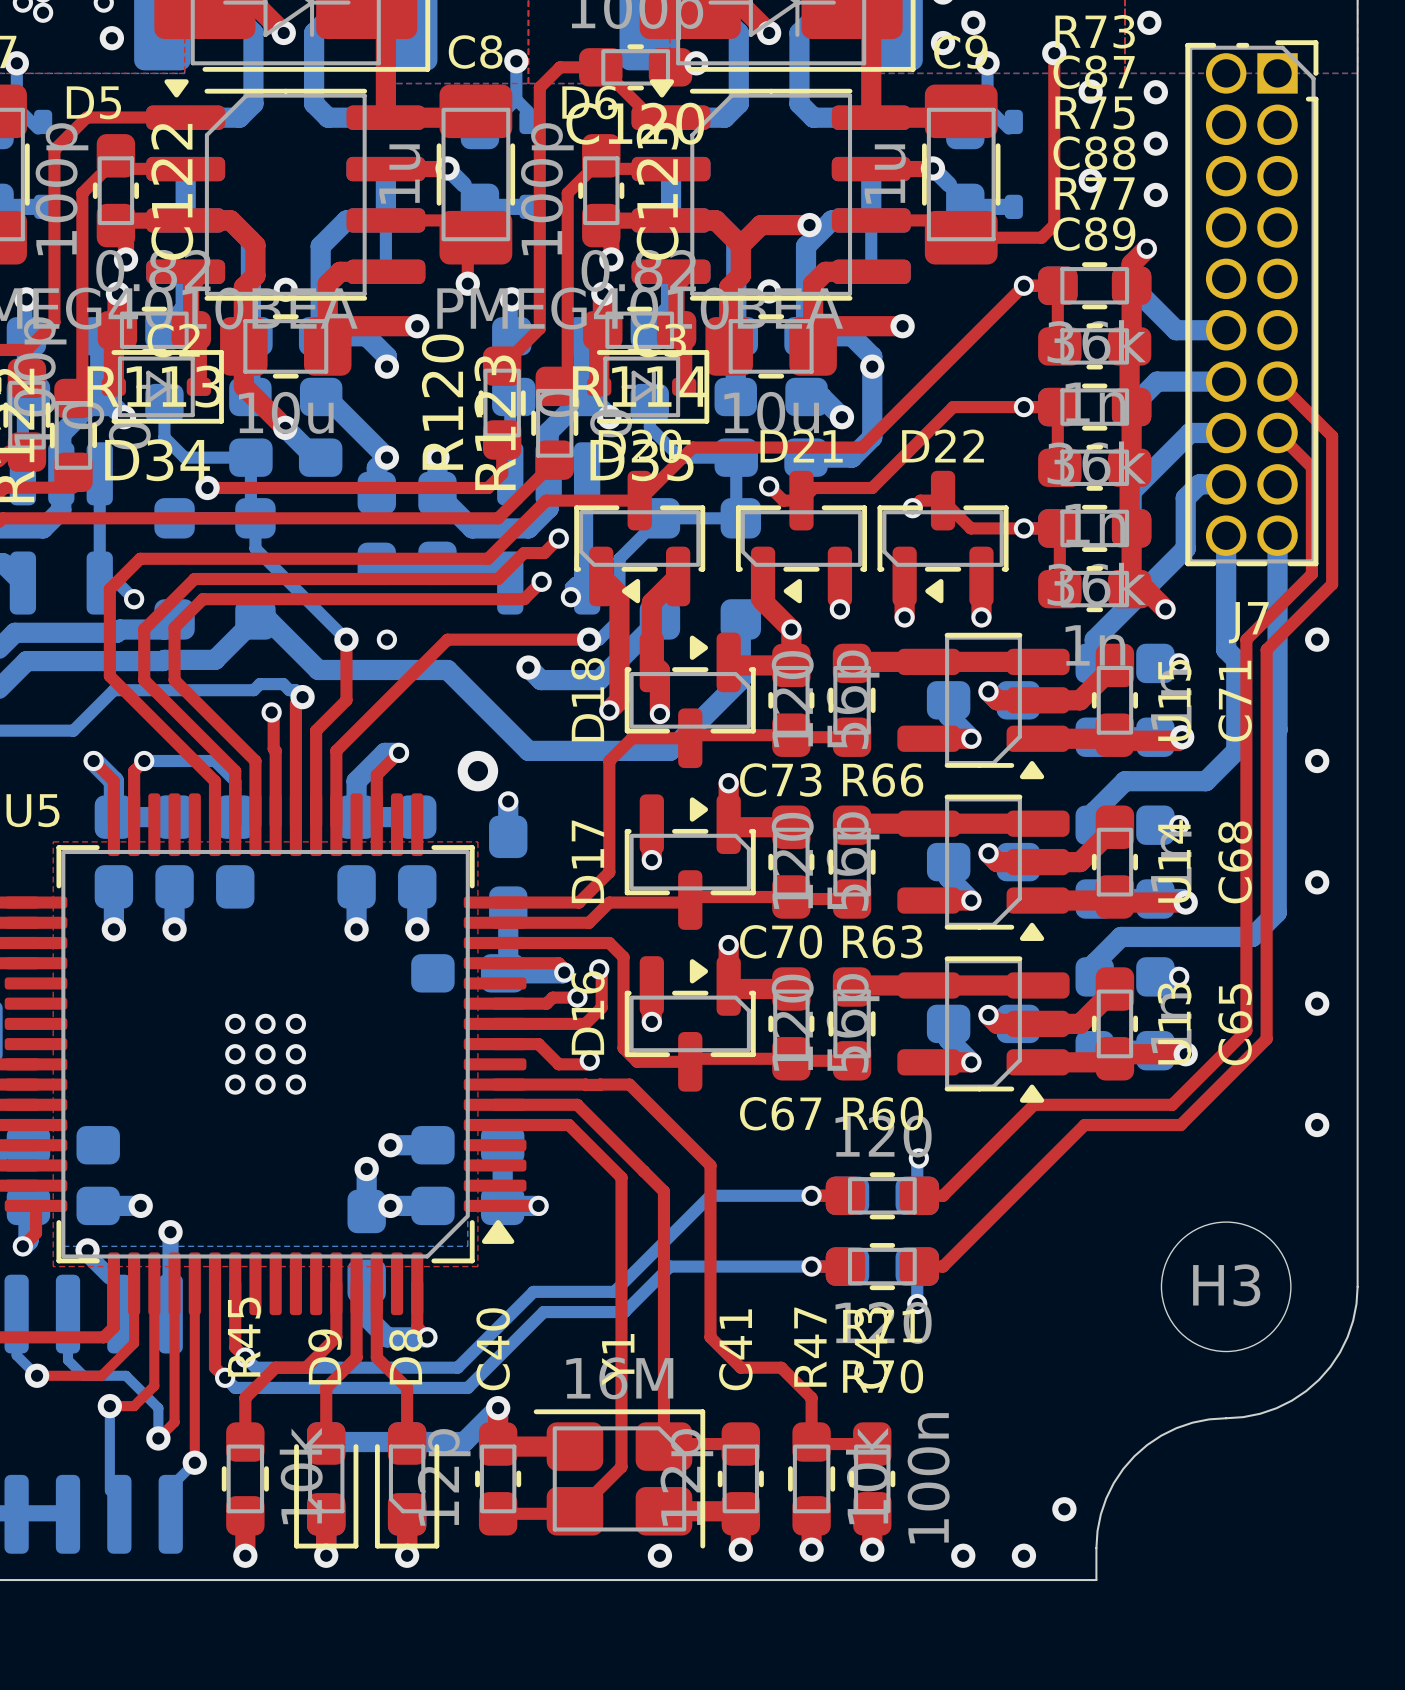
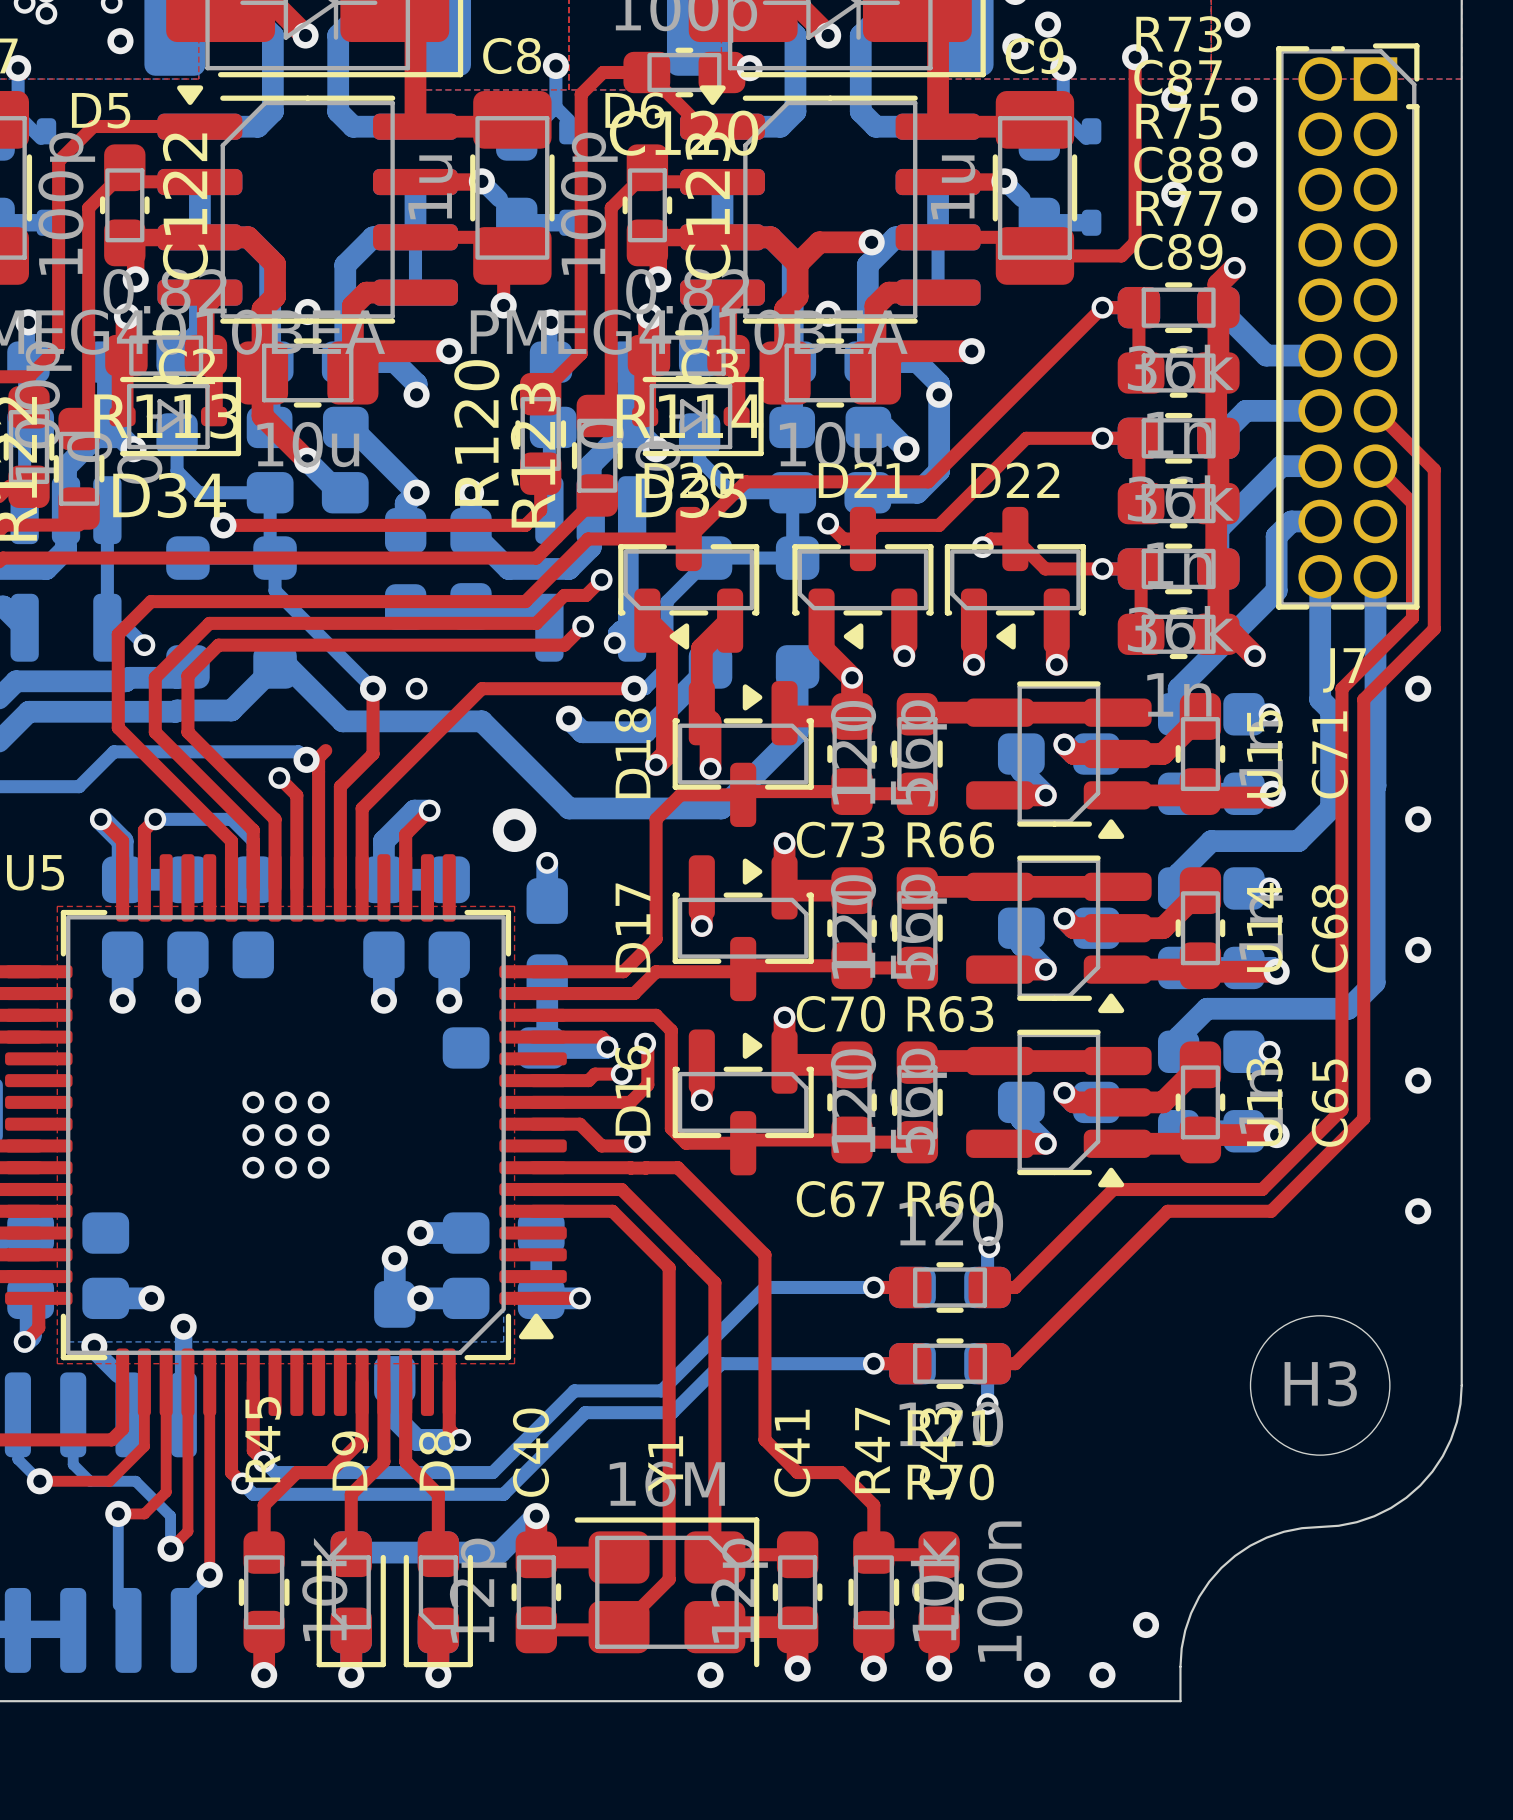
bottom track: (302, 697) (295, 690) (289, 690) (283, 684) (259, 684) (253, 690) (113, 690) (105, 698) -> (306, 759) (298, 751) (113, 751)
via position: (302, 697) -> (306, 759)
top track: (271, 712) (273, 714) (273, 748) (275, 750) -> (279, 777) (296, 795) (296, 808)
via position: (271, 712) -> (279, 777)

